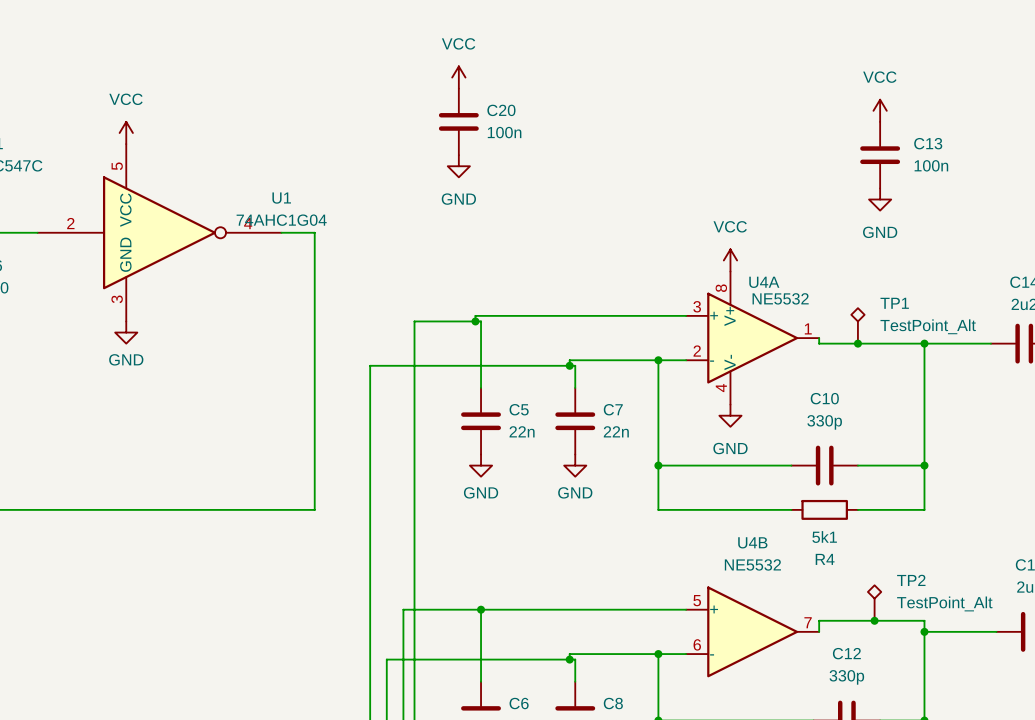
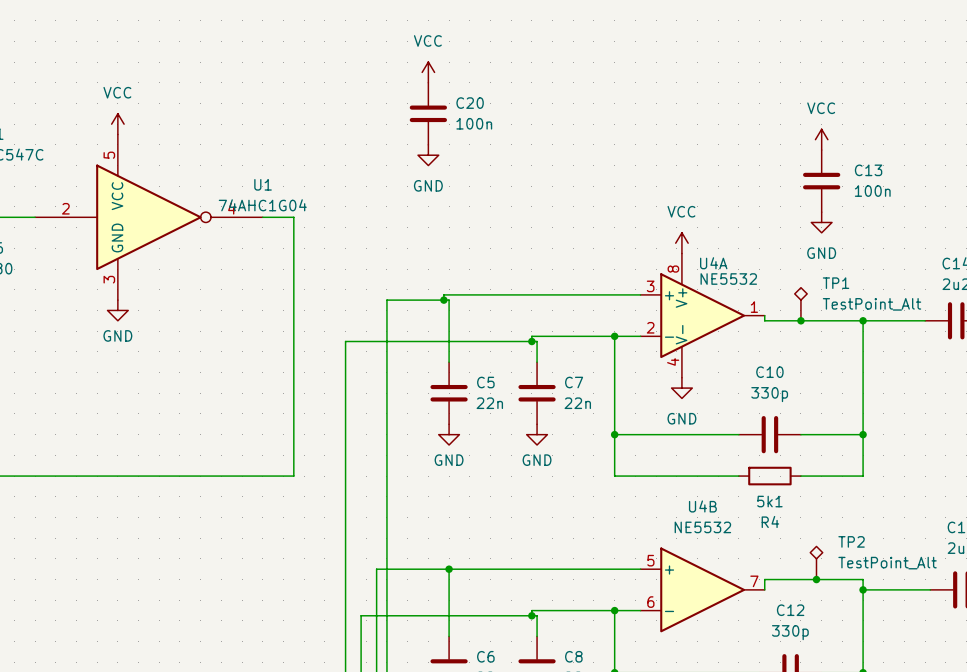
power symbol position: VCC (880, 110) -> VCC (821, 139)
C13 position: (880, 155) -> (821, 181)
power symbol position: GND (880, 199) -> GND (821, 222)

